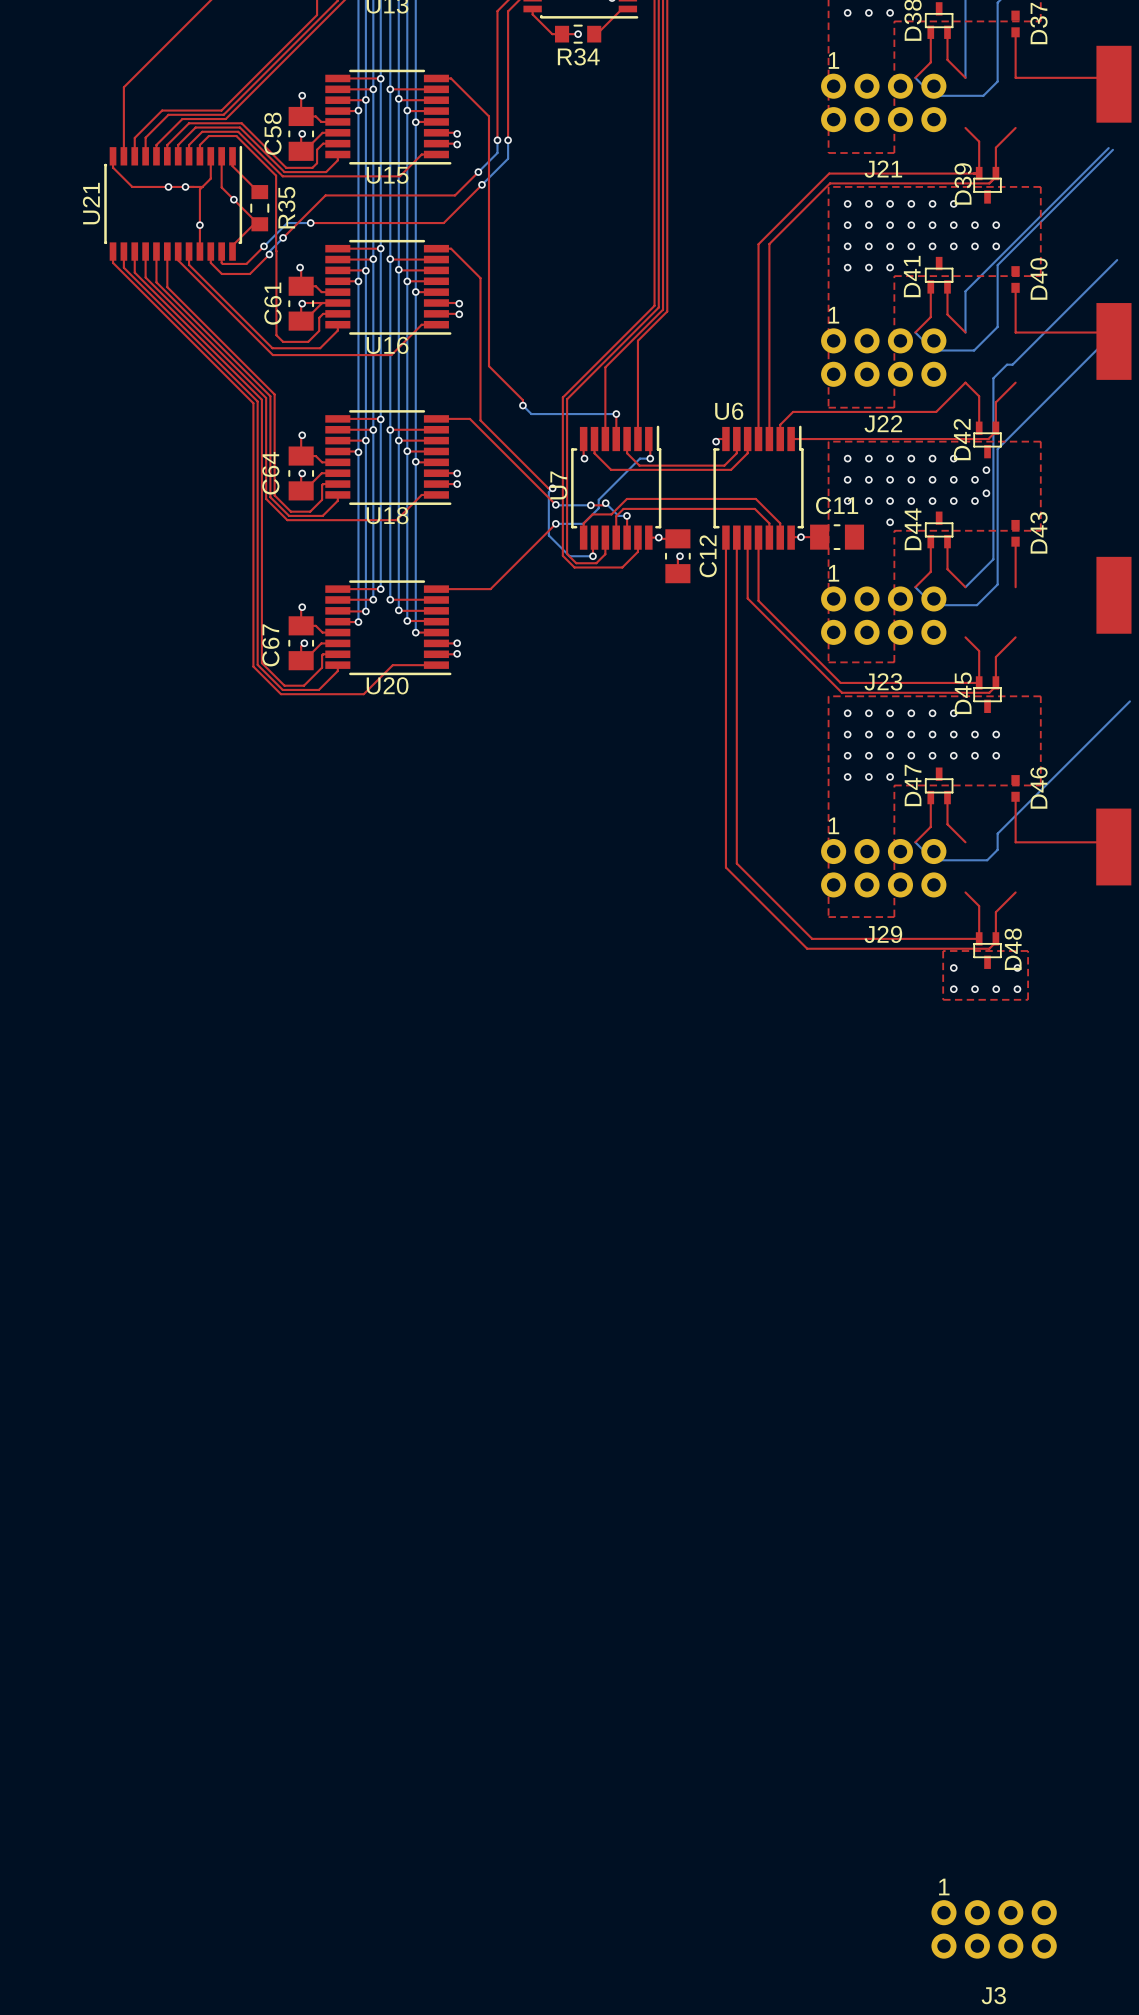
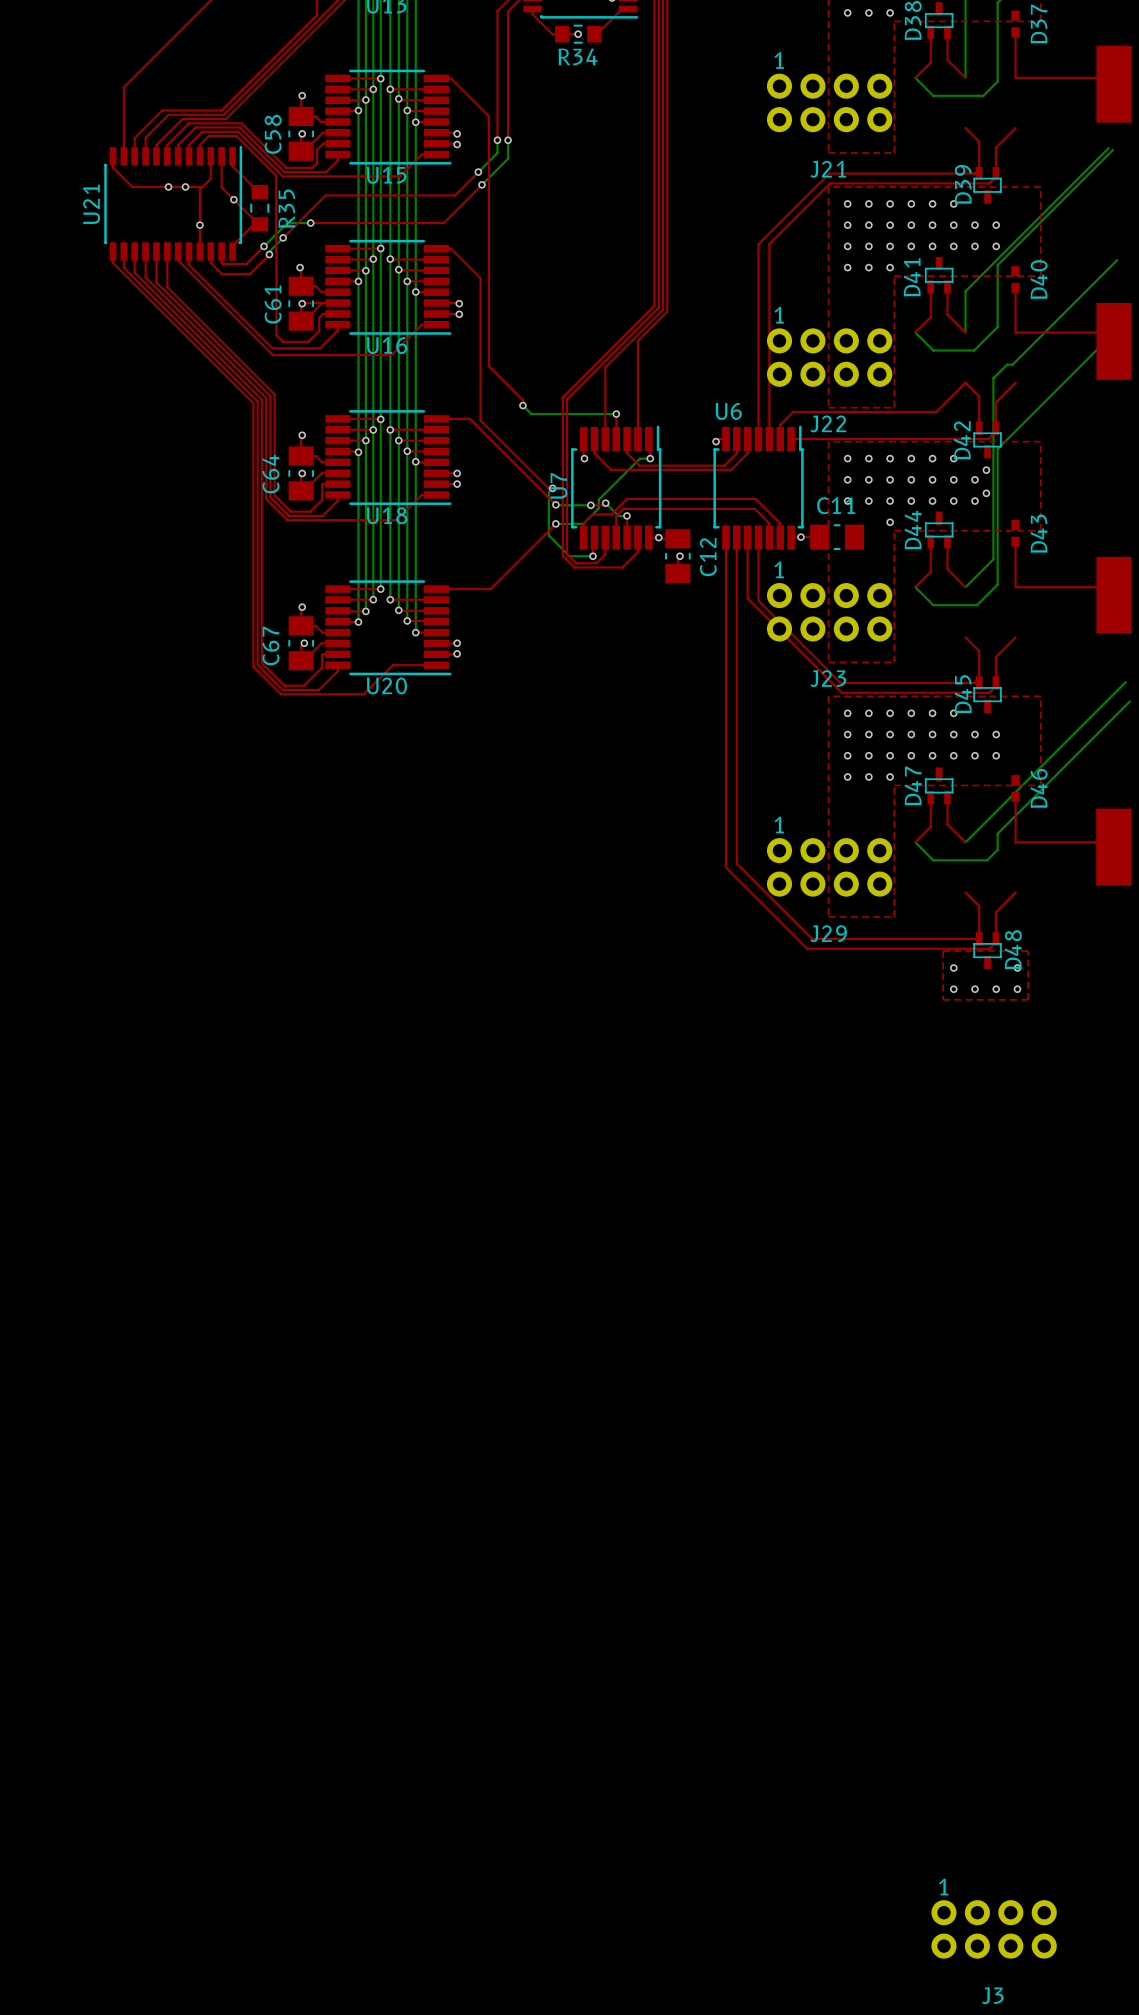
J21 position: (883, 102) -> (829, 102)
J22 position: (883, 357) -> (829, 357)
top track: none -> (1015, 587) (1105, 587) (1113, 595)
J23 position: (883, 615) -> (829, 612)
bottom track: none -> (1125, 682) (965, 842)
J29 position: (883, 868) -> (829, 867)

